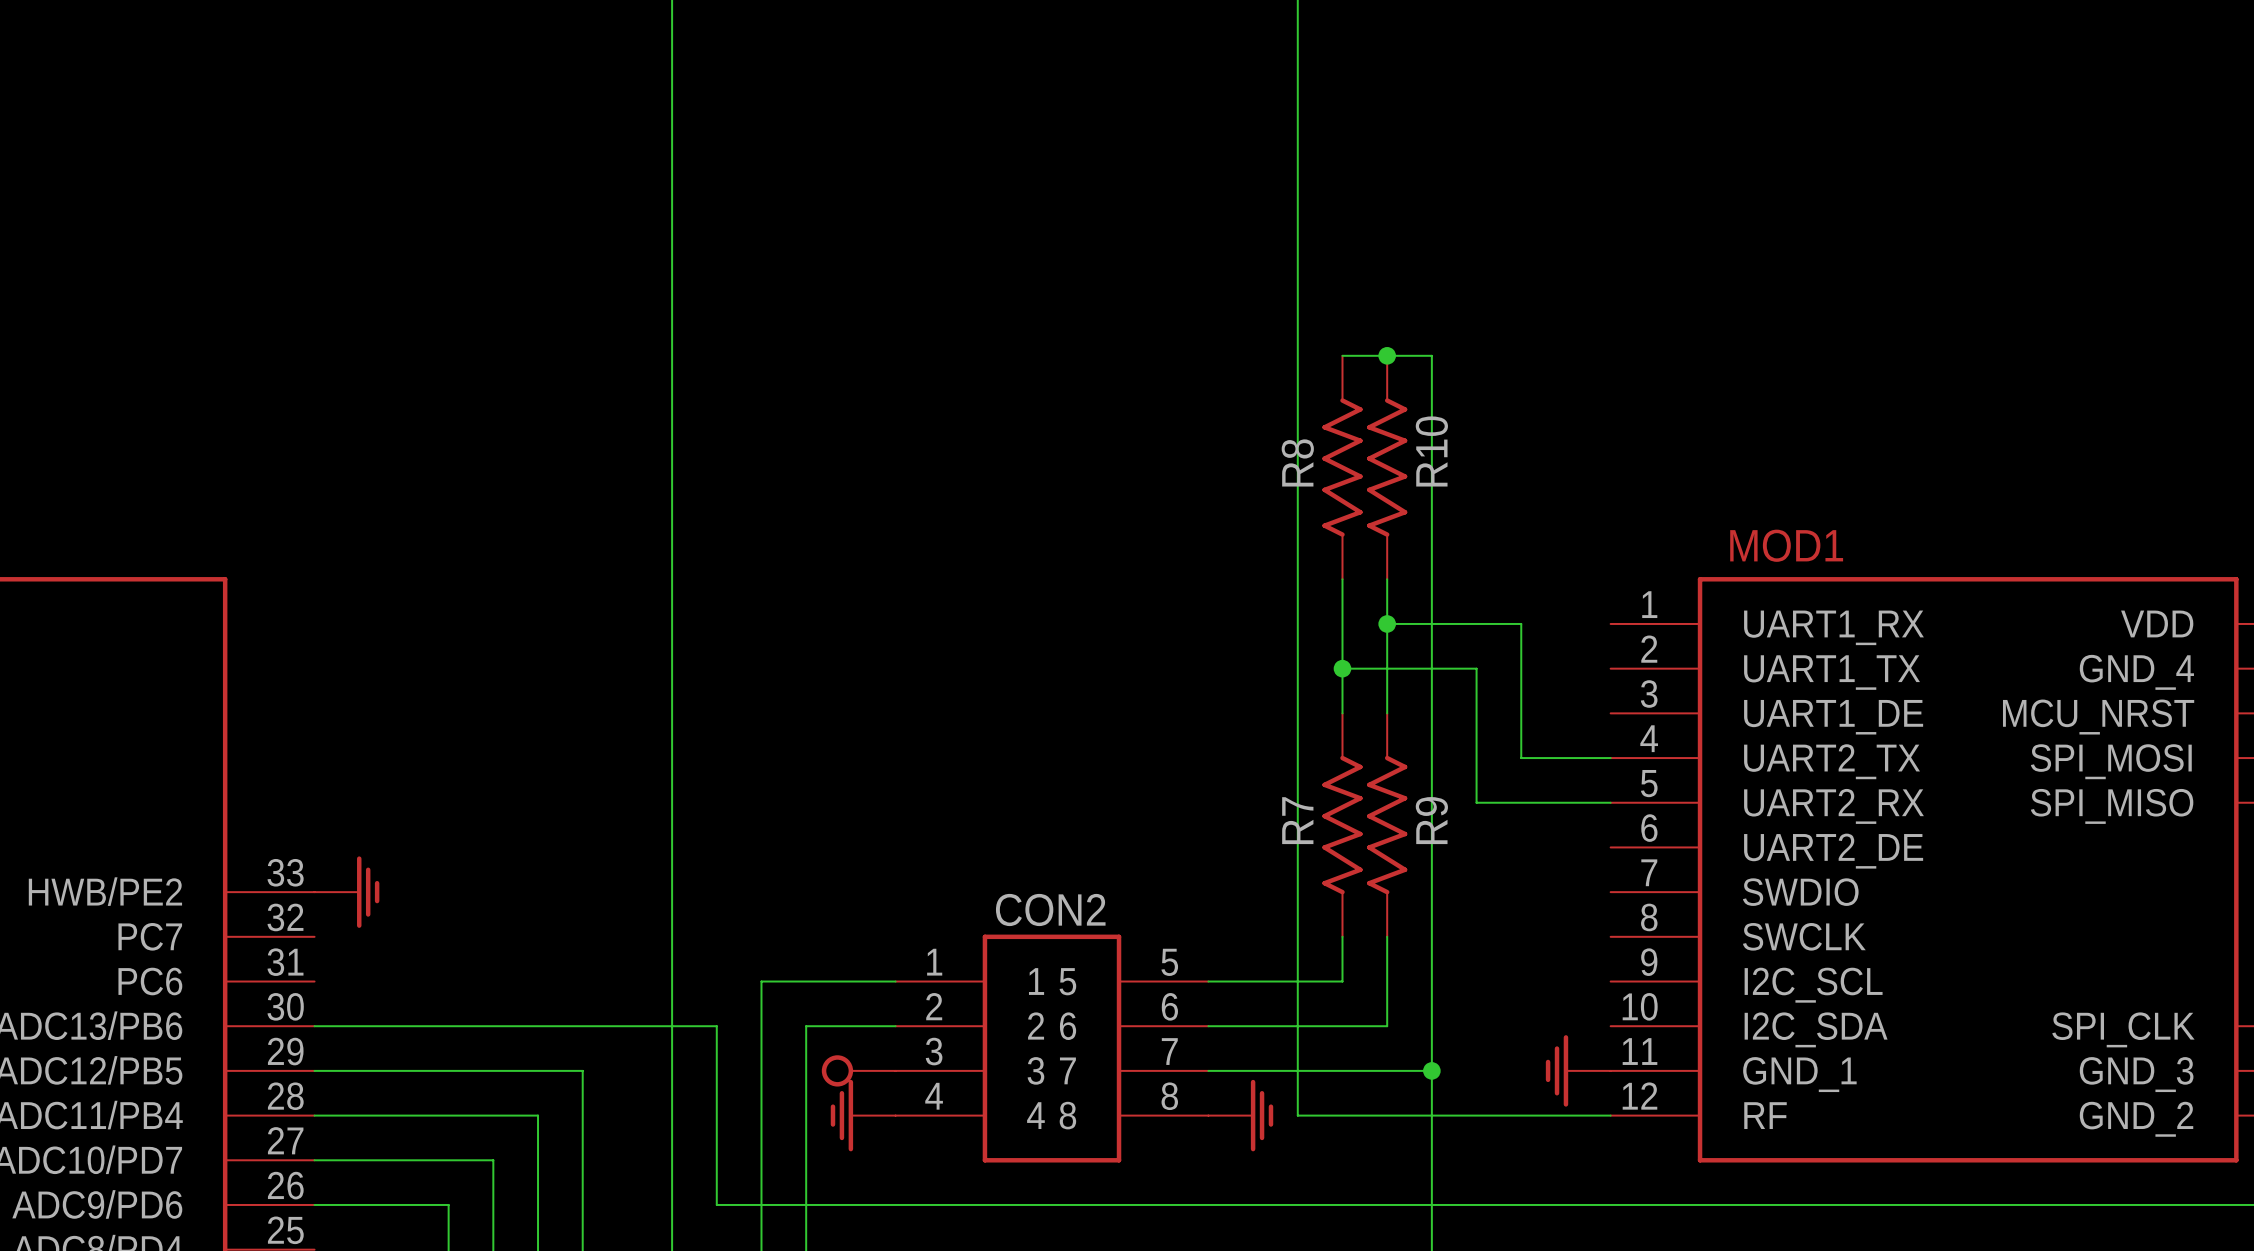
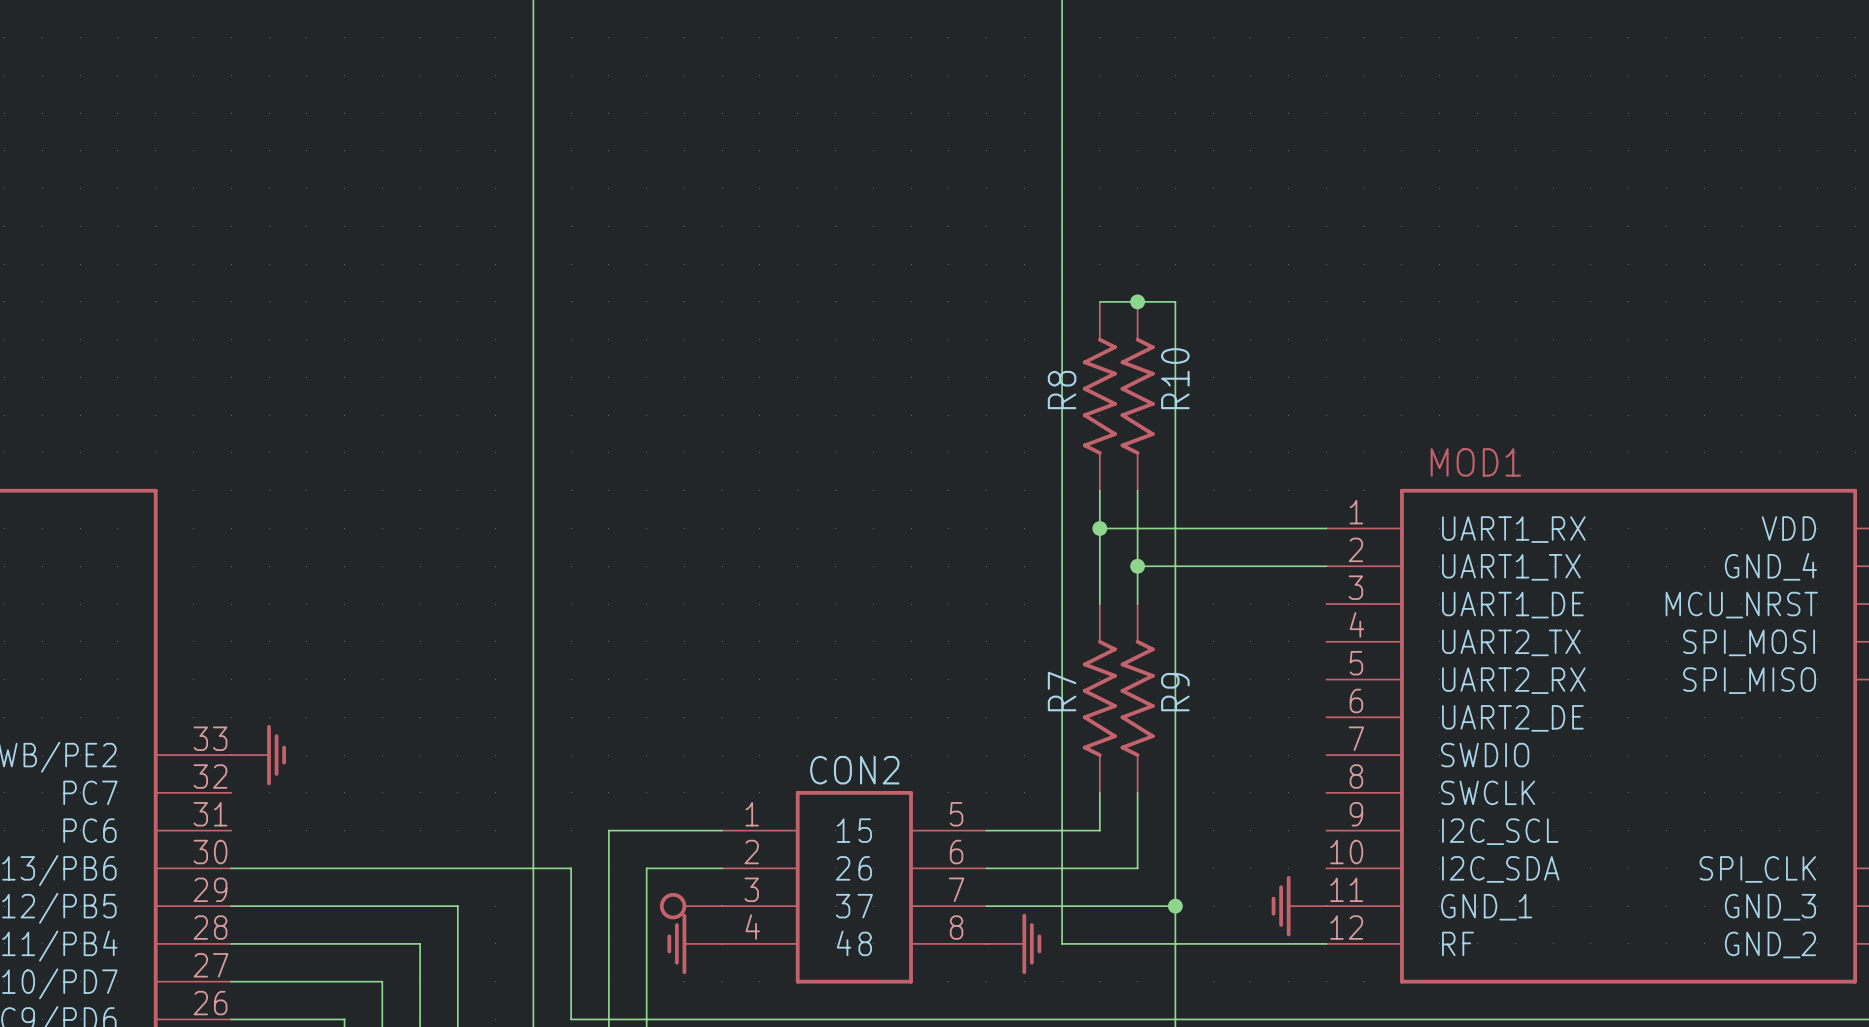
junction: none -> (1099, 528)
junction: (1387, 623) -> none
wire: (1521, 623) (1521, 758) (1610, 758) -> (1250, 528) (1326, 528)
wire: (1342, 668) (1387, 668) -> (1099, 528) (1137, 528)
junction: (1342, 668) -> none
junction: none -> (1137, 566)
wire: (1476, 668) (1476, 802) (1610, 802) -> (1213, 566) (1326, 566)

